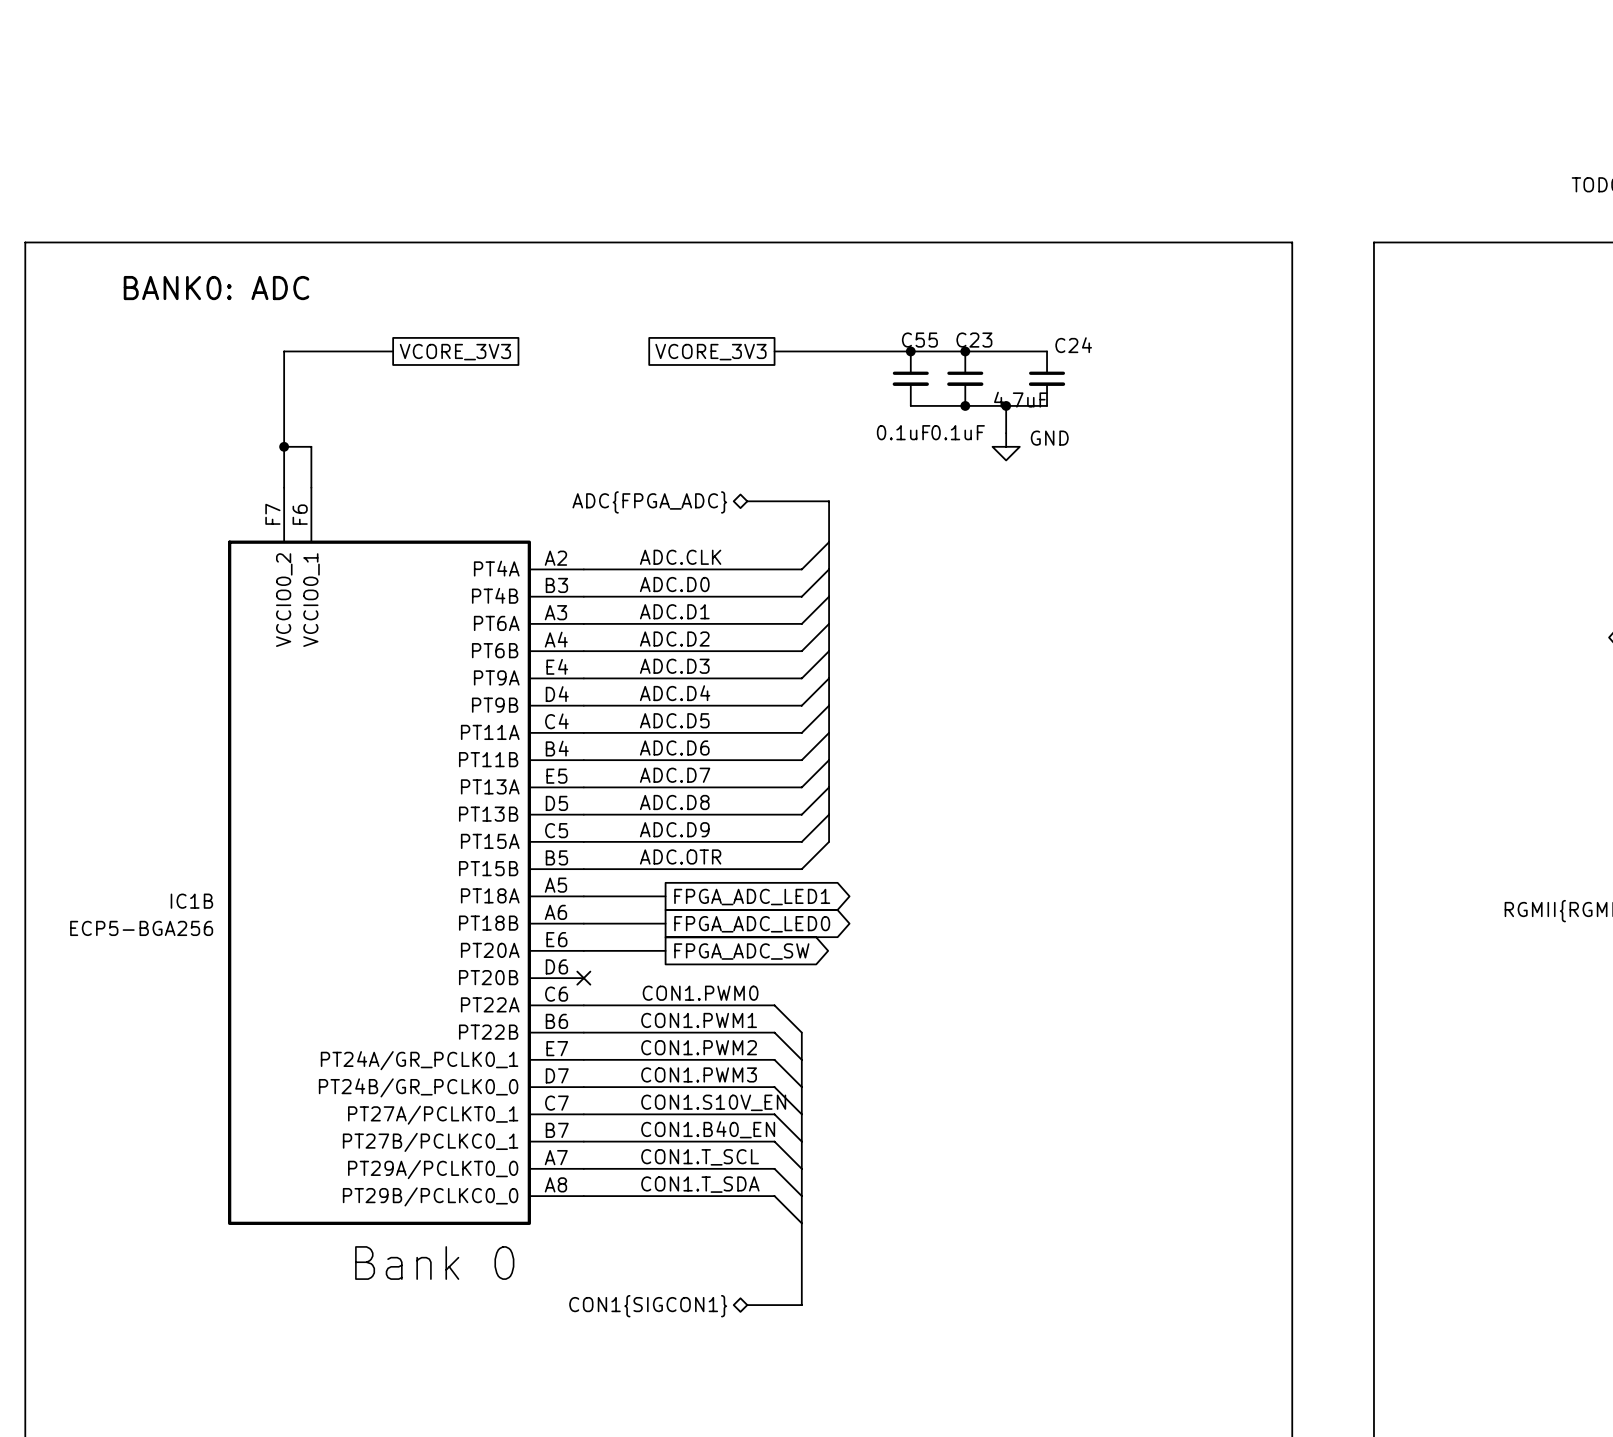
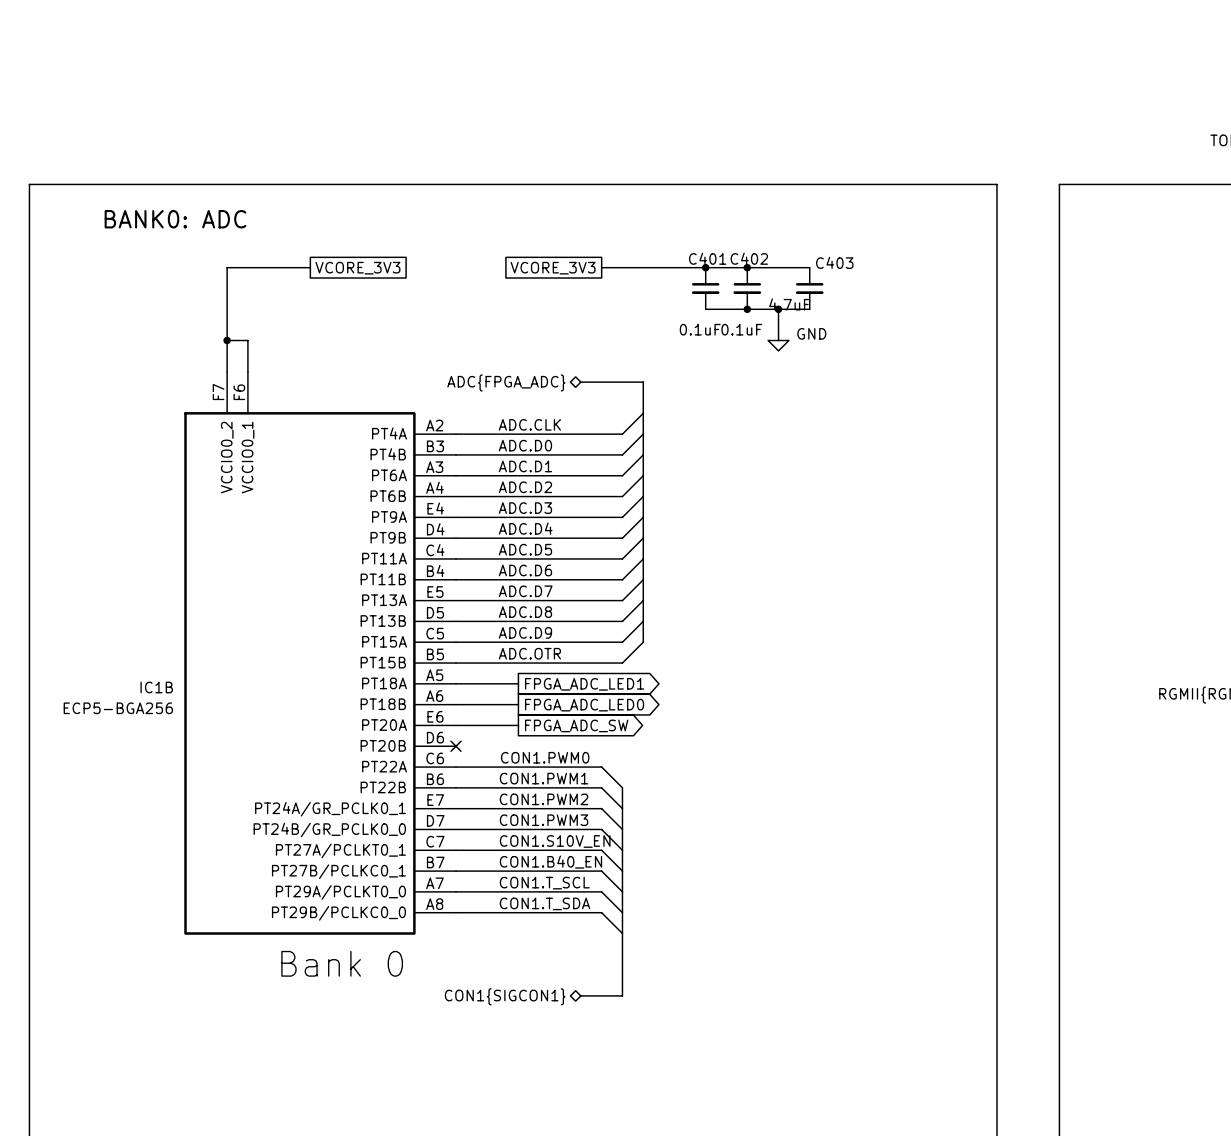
C55 name: C55 (919, 340) -> C401 (707, 258)
C23 name: C23 (974, 340) -> C402 (749, 258)
C24 name: C24 (1073, 345) -> C403 (834, 262)

